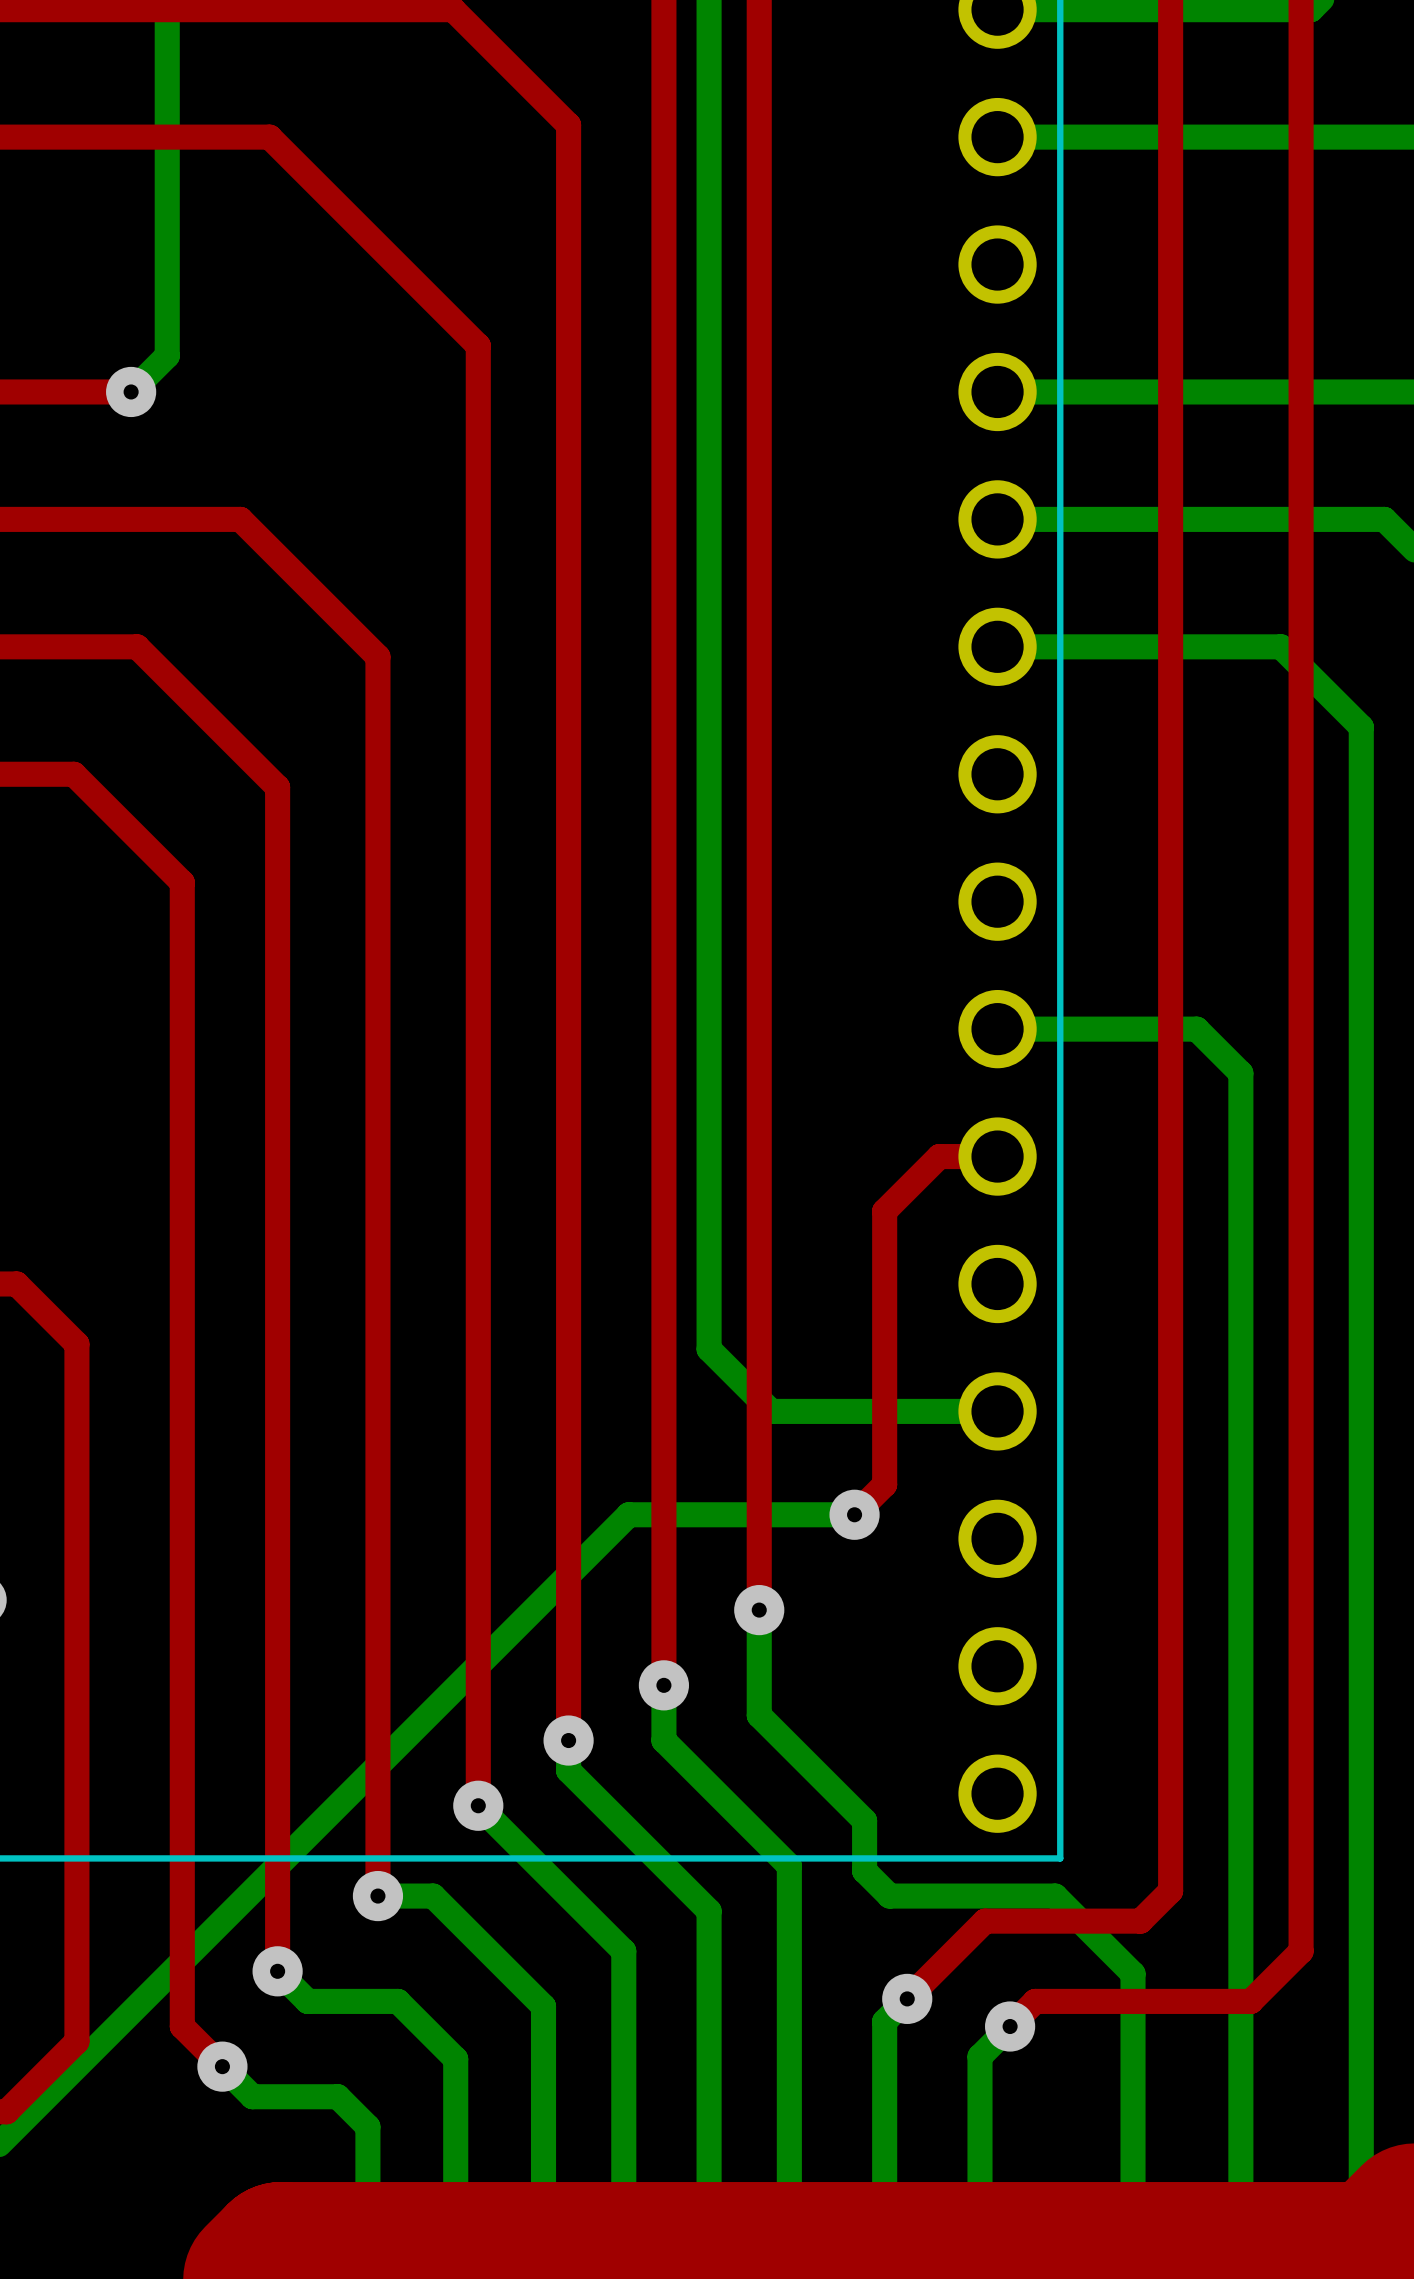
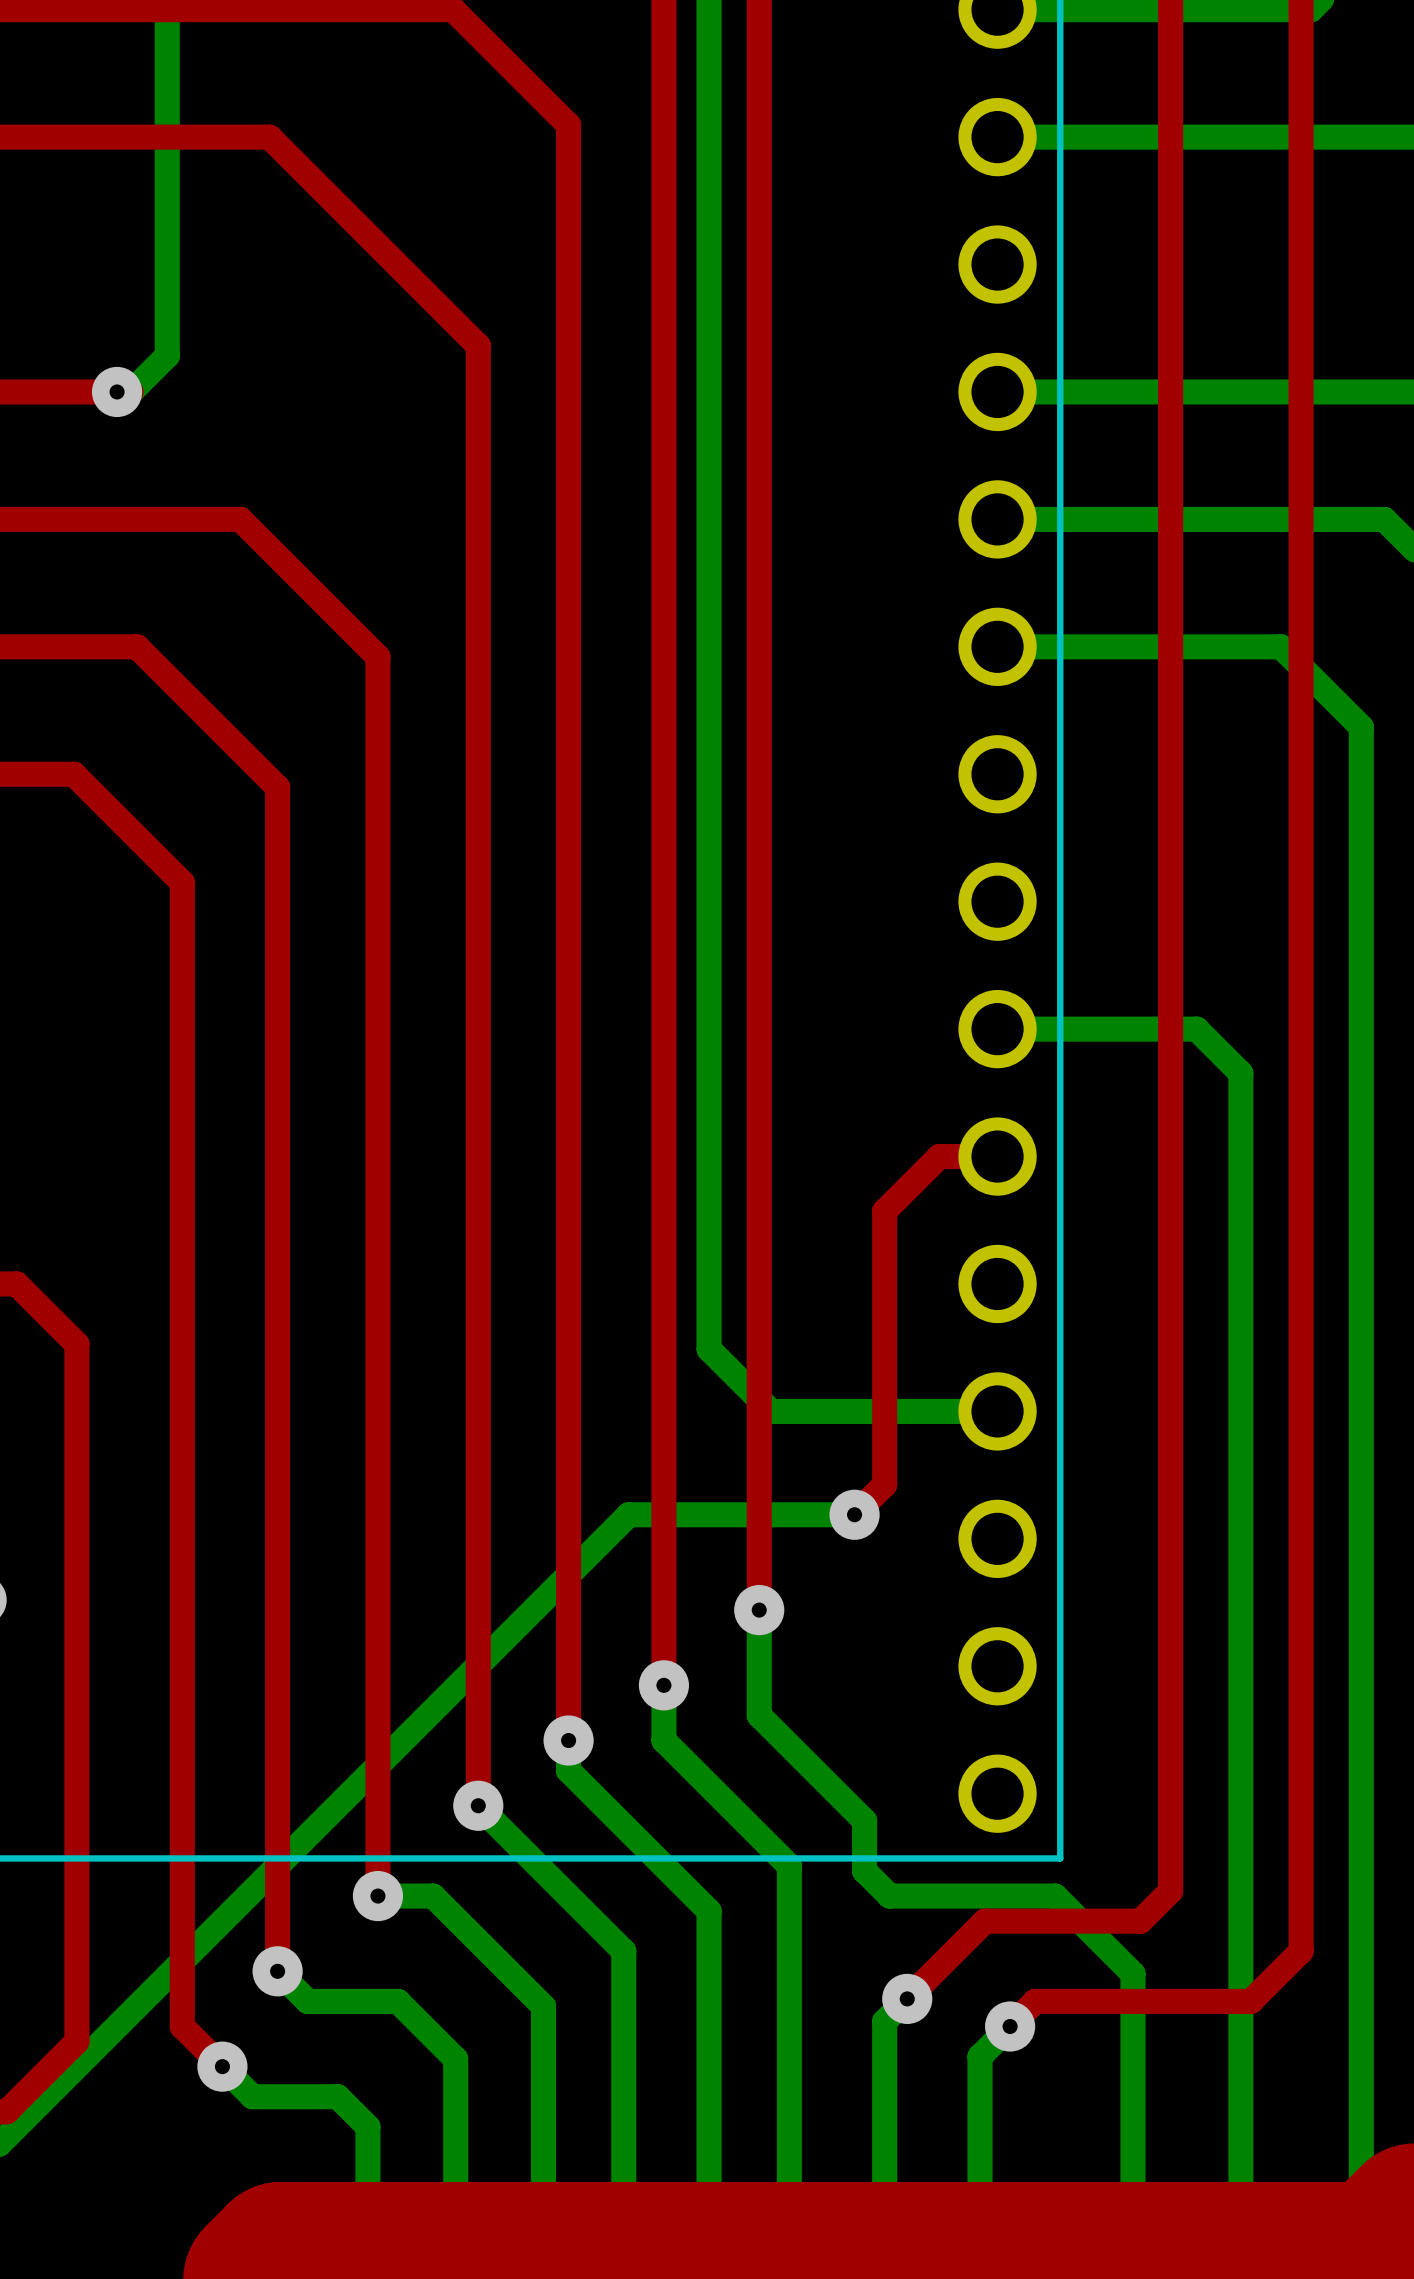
via position: (131, 391) -> (117, 391)

